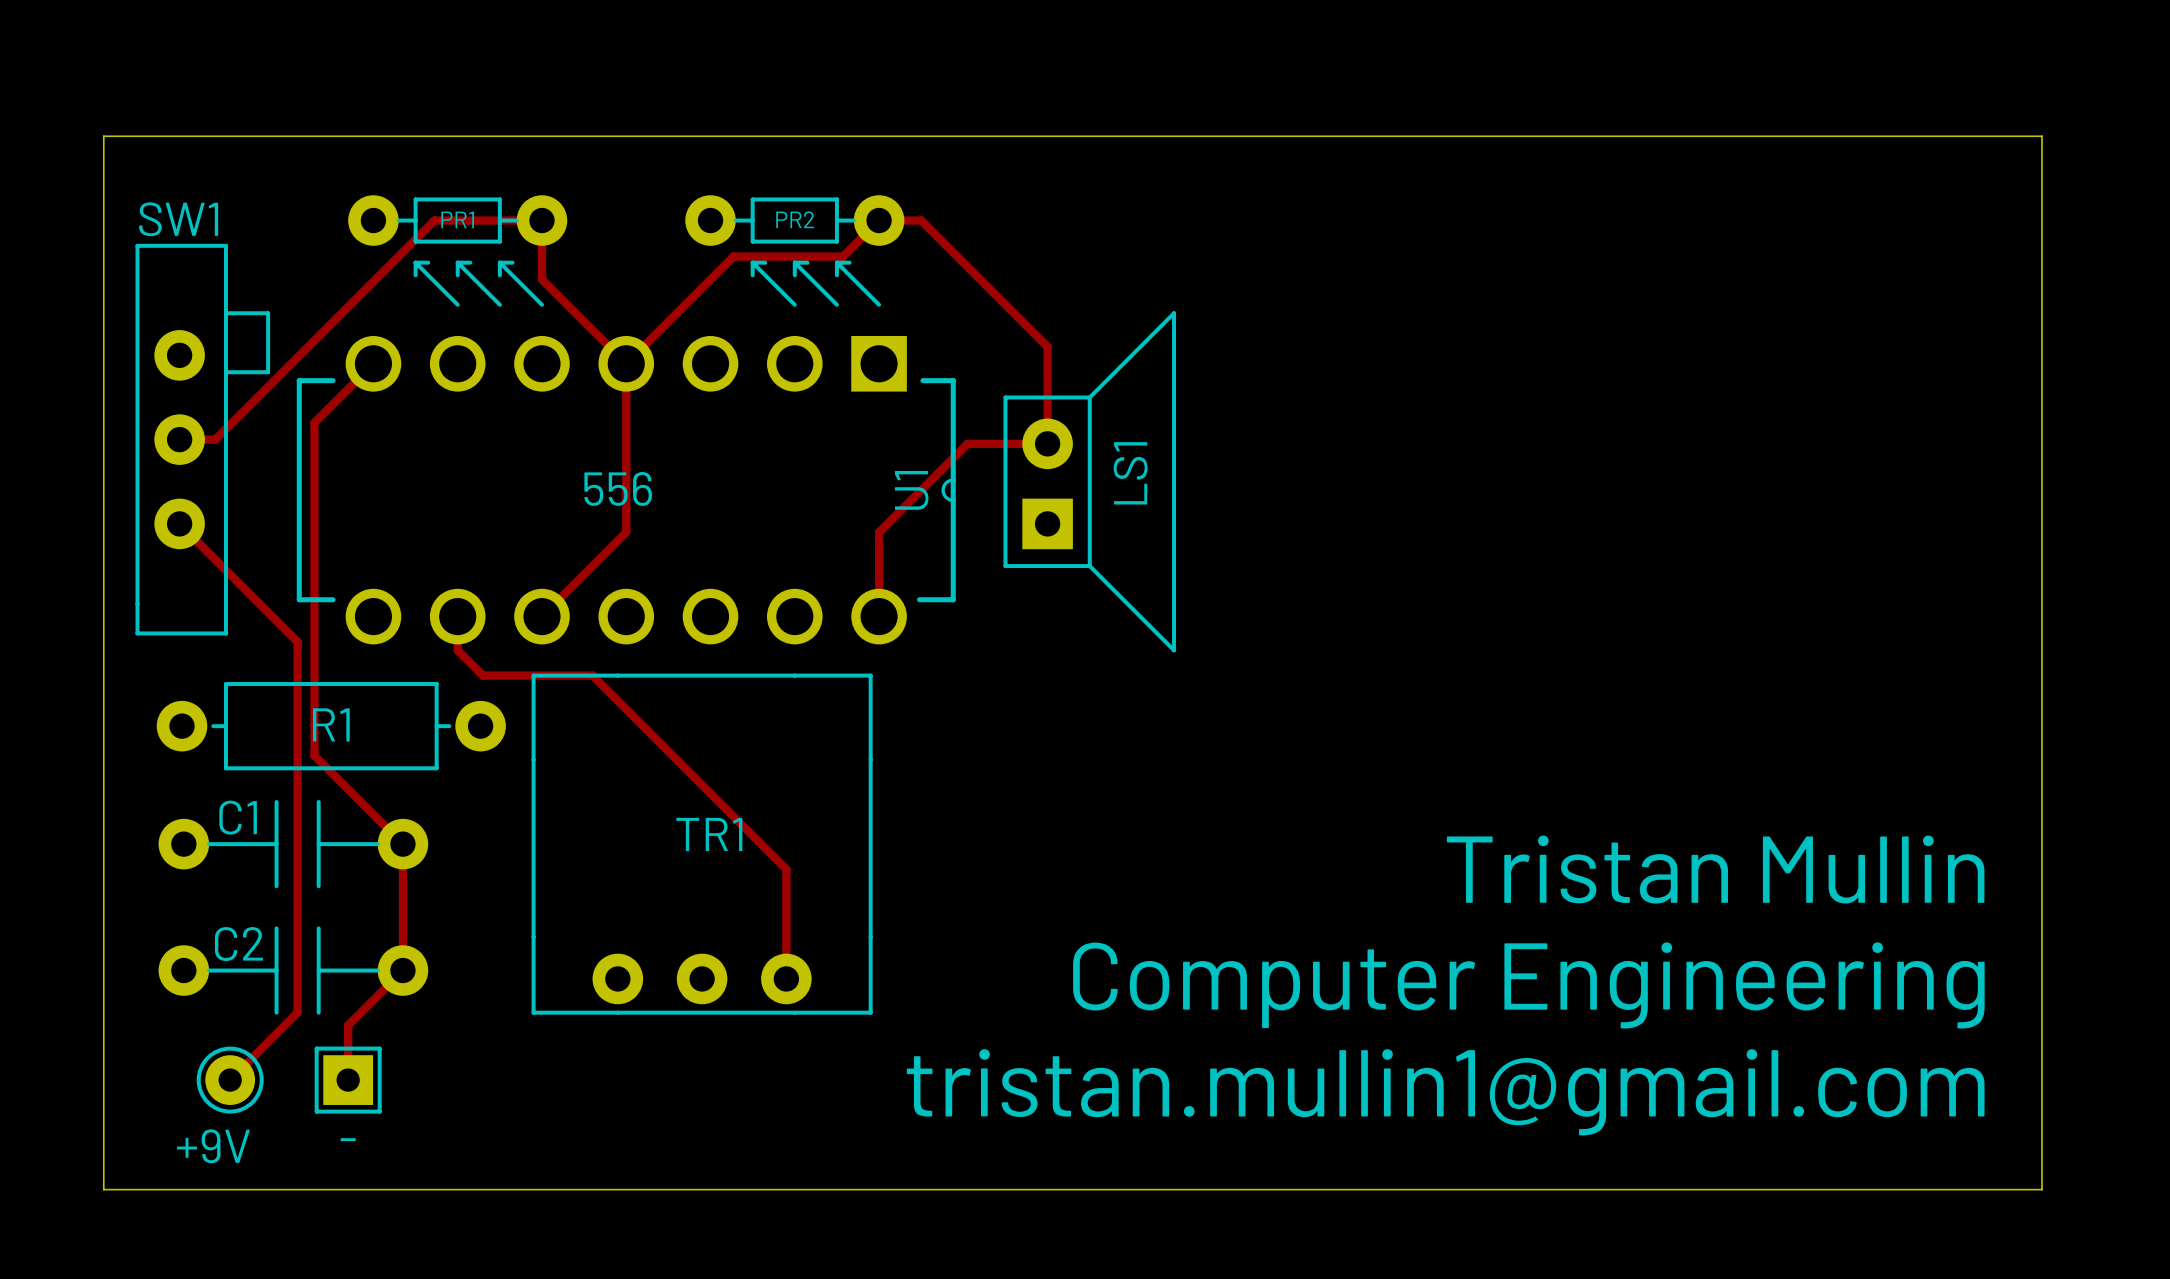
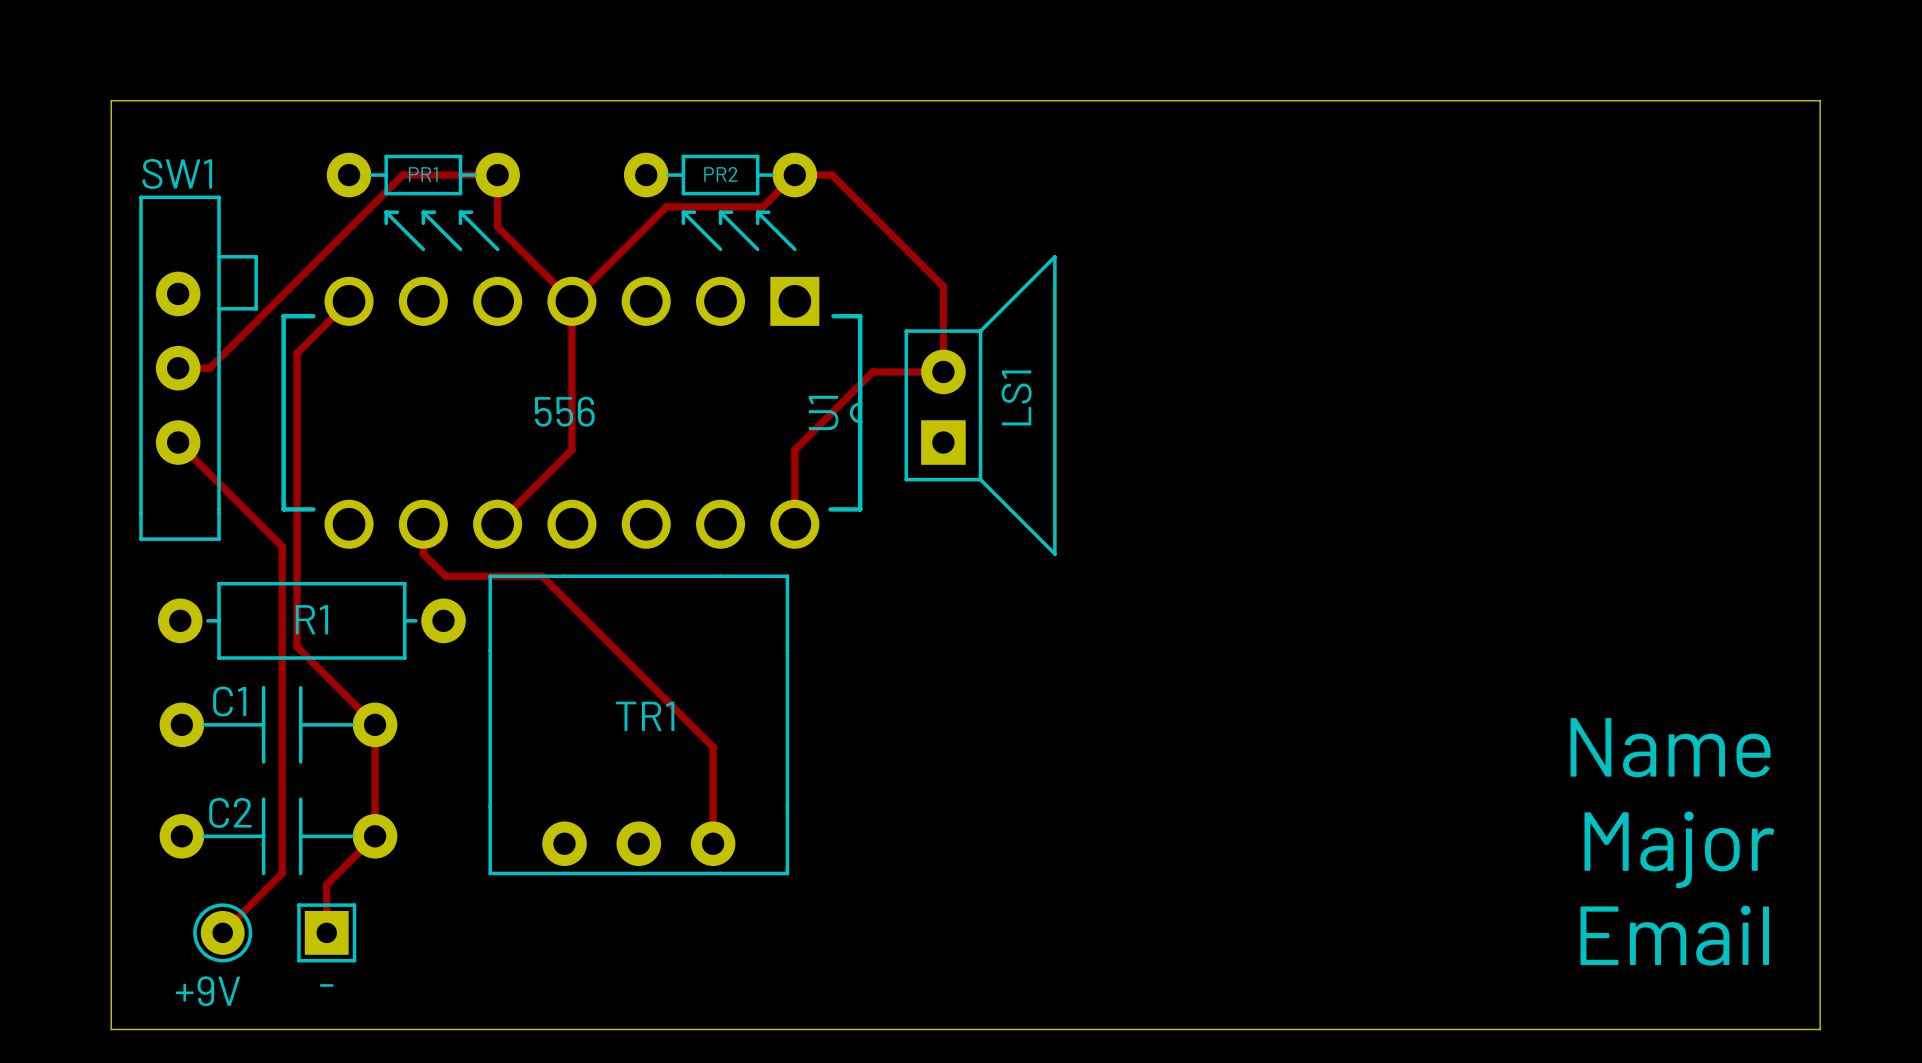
text: Tristan Mullin (1715, 869) -> Name (1670, 747)
text: Computer Engineering (1528, 985) -> Major (1679, 849)
text: tristan.mullin1@gmail.com (1445, 1092) -> Email (1674, 935)

